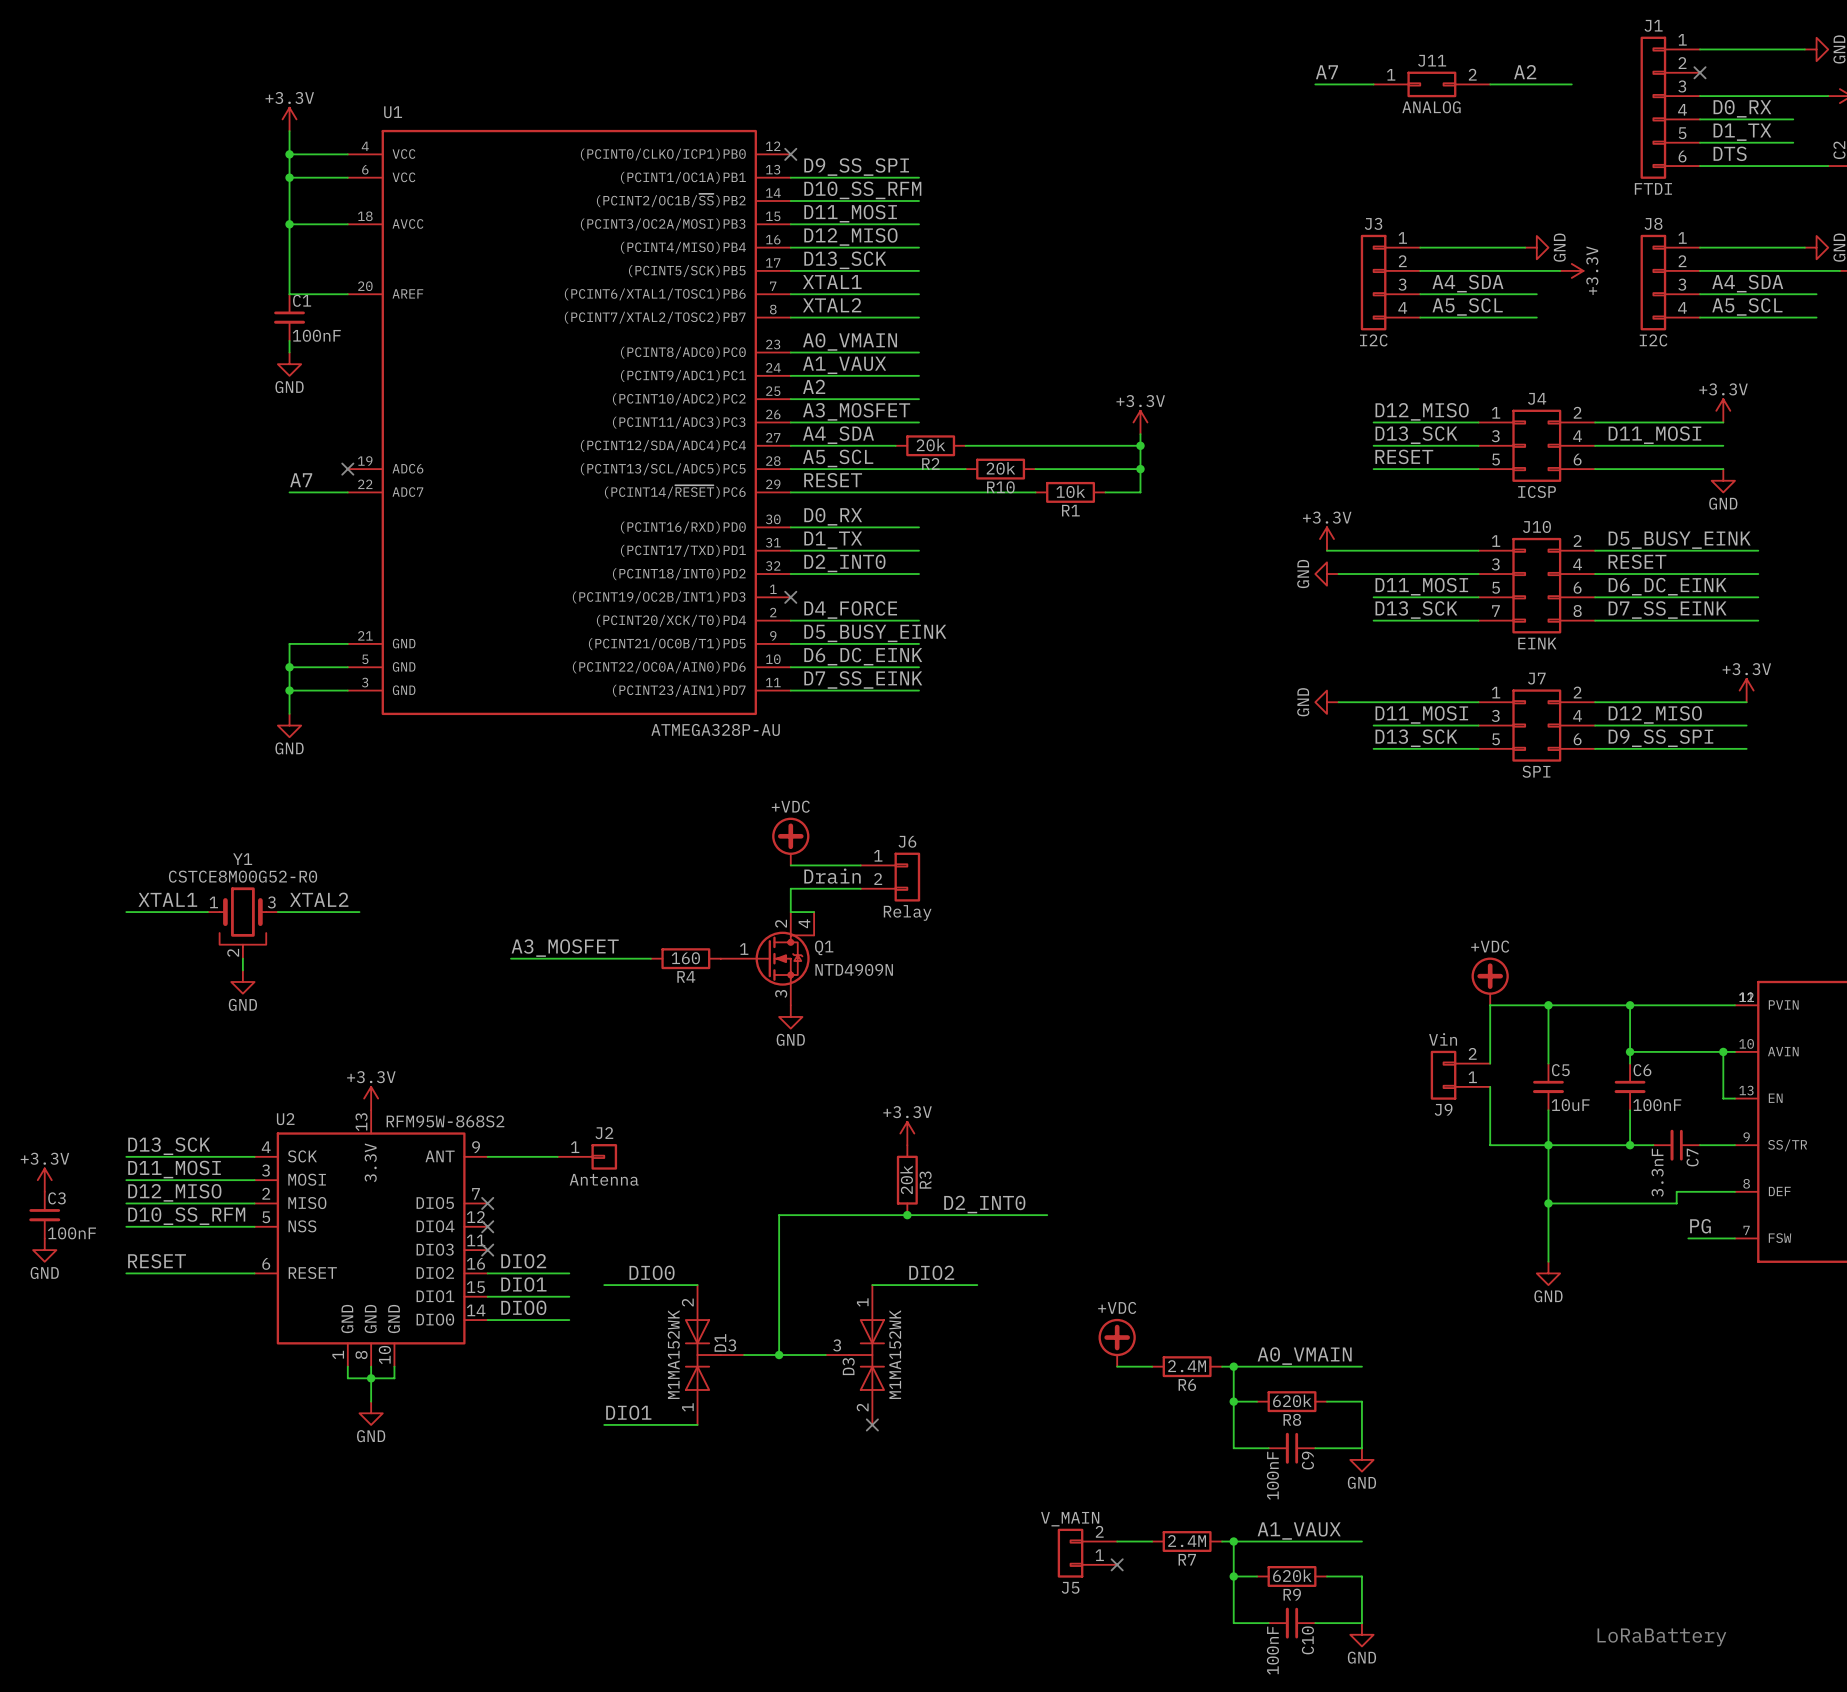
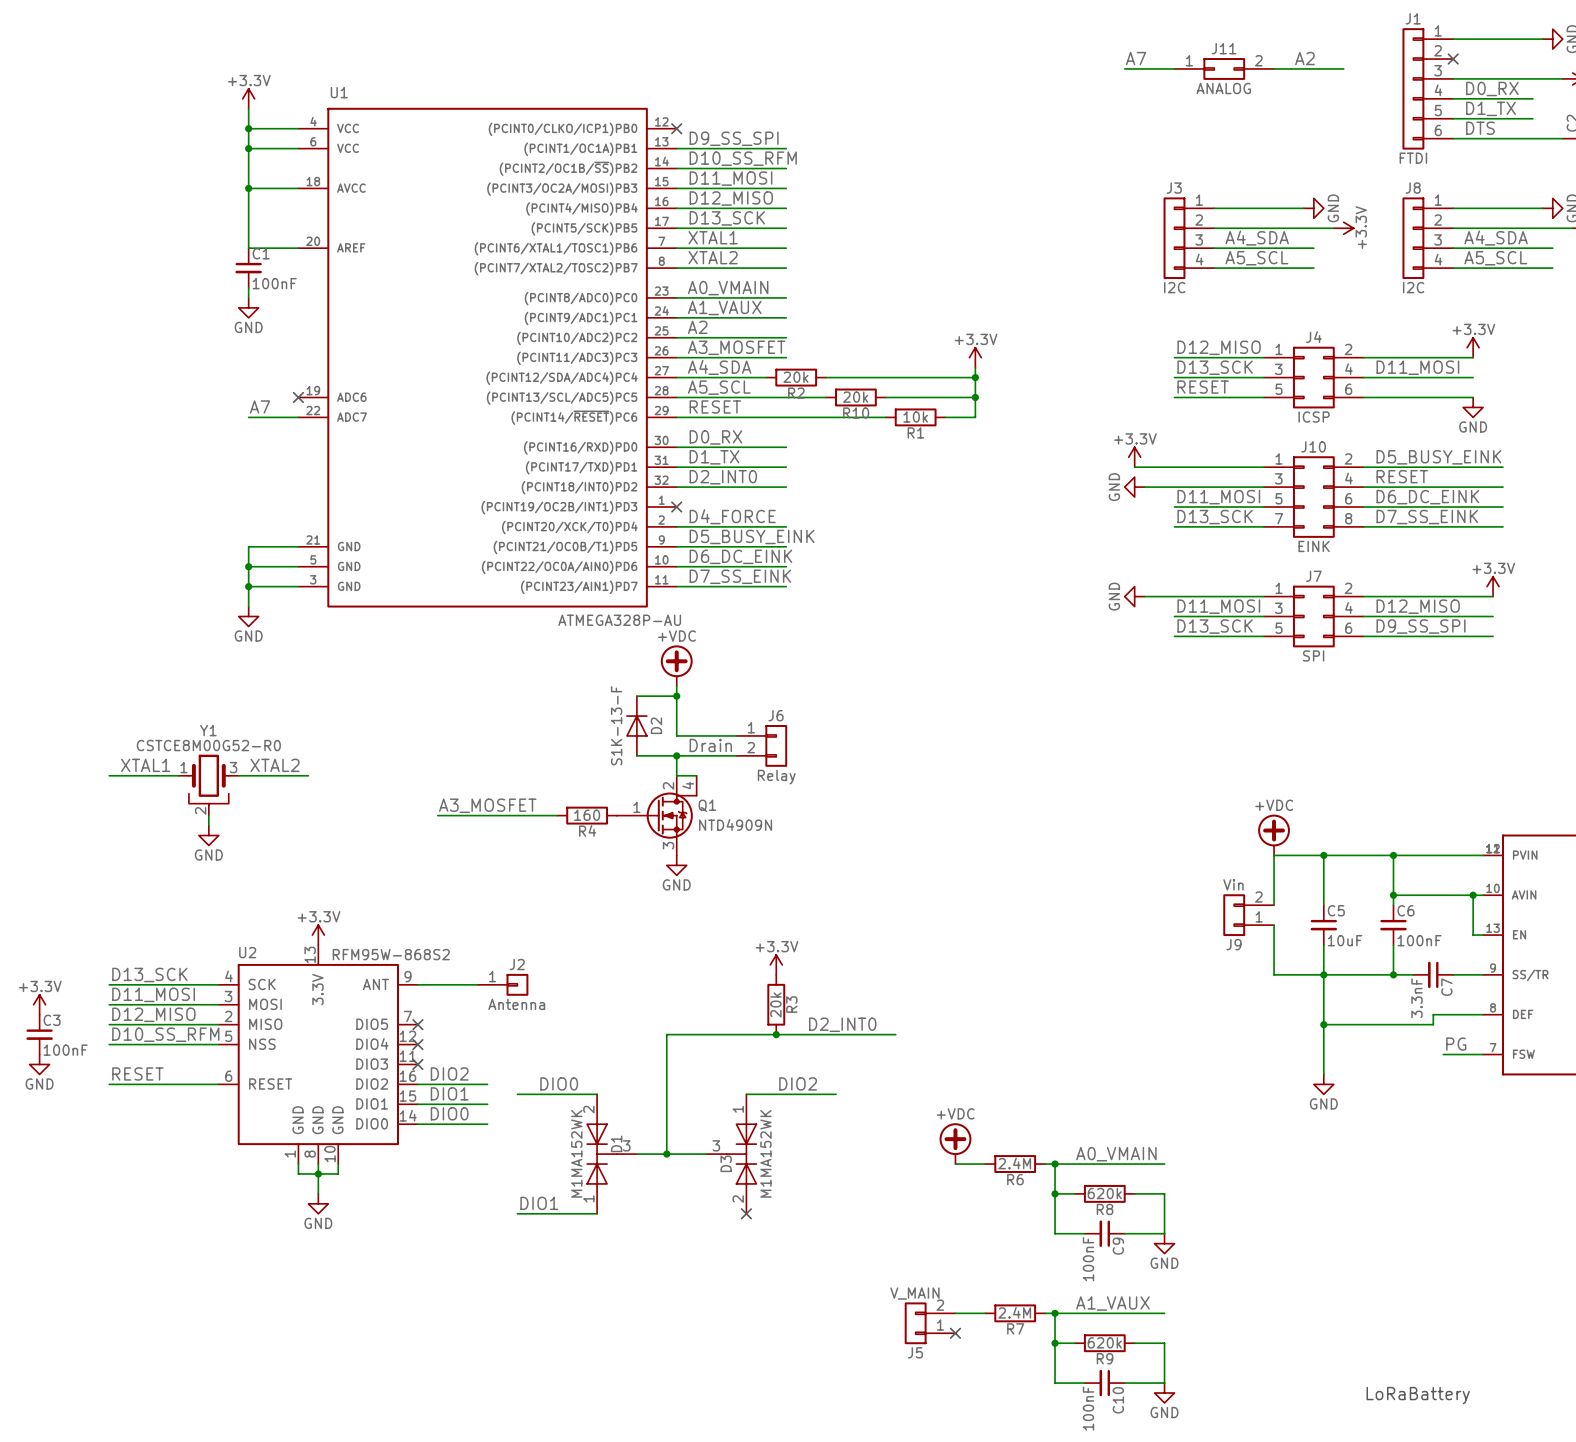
wire: none -> (636, 696) (676, 696)
junction: none -> (676, 696)
power symbol position: +VDC (790, 841) -> +VDC (676, 665)
D2: none -> S1K-13-F (636, 726)
wire: none -> (636, 755) (676, 755)
junction: none -> (676, 755)

